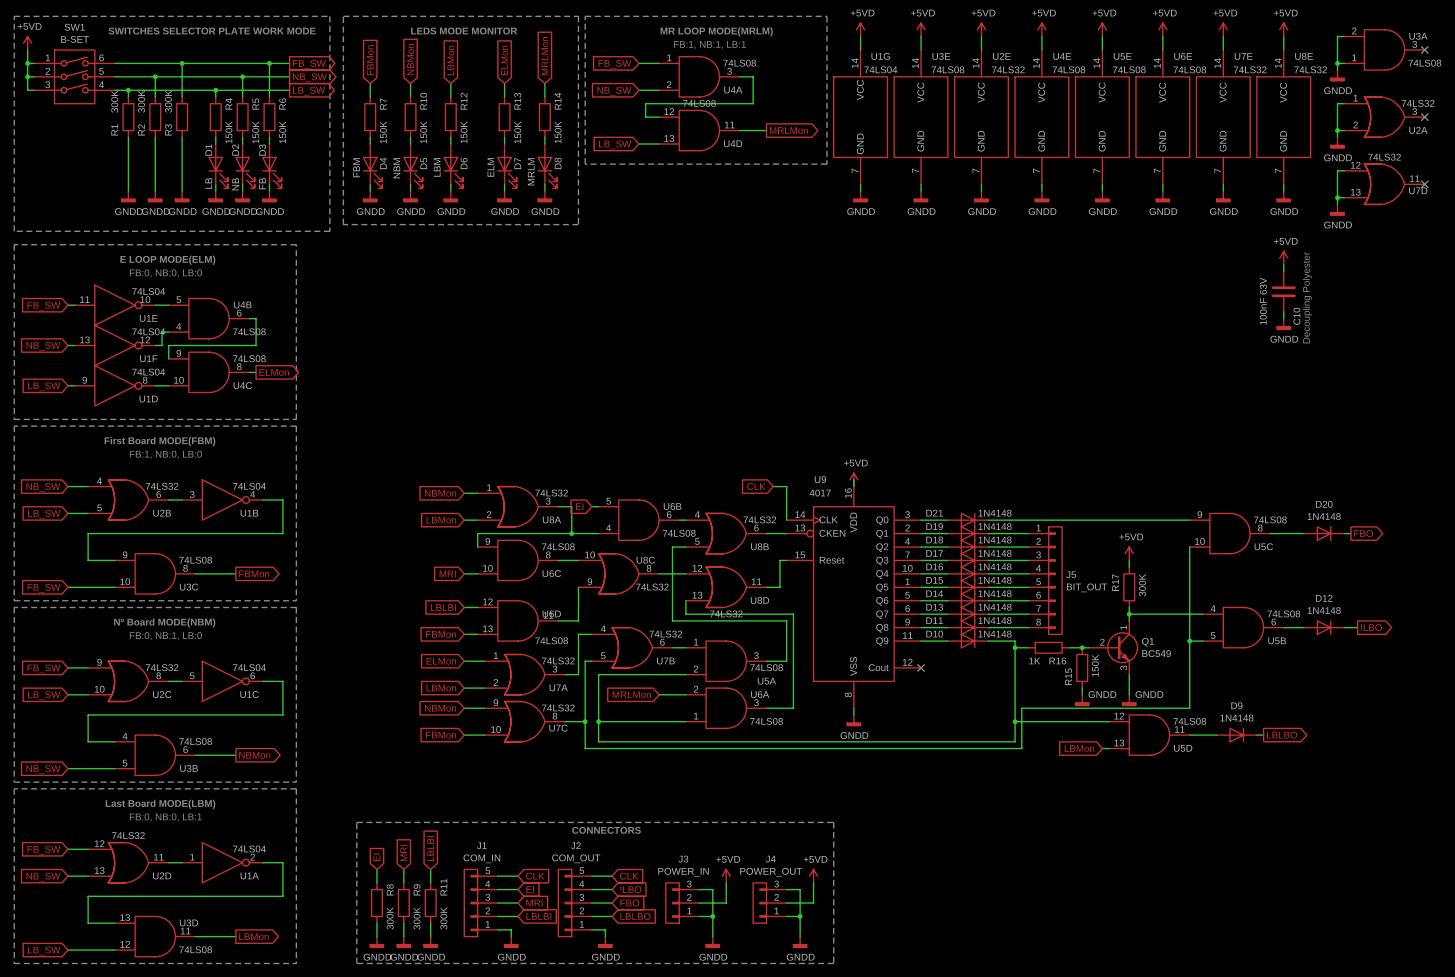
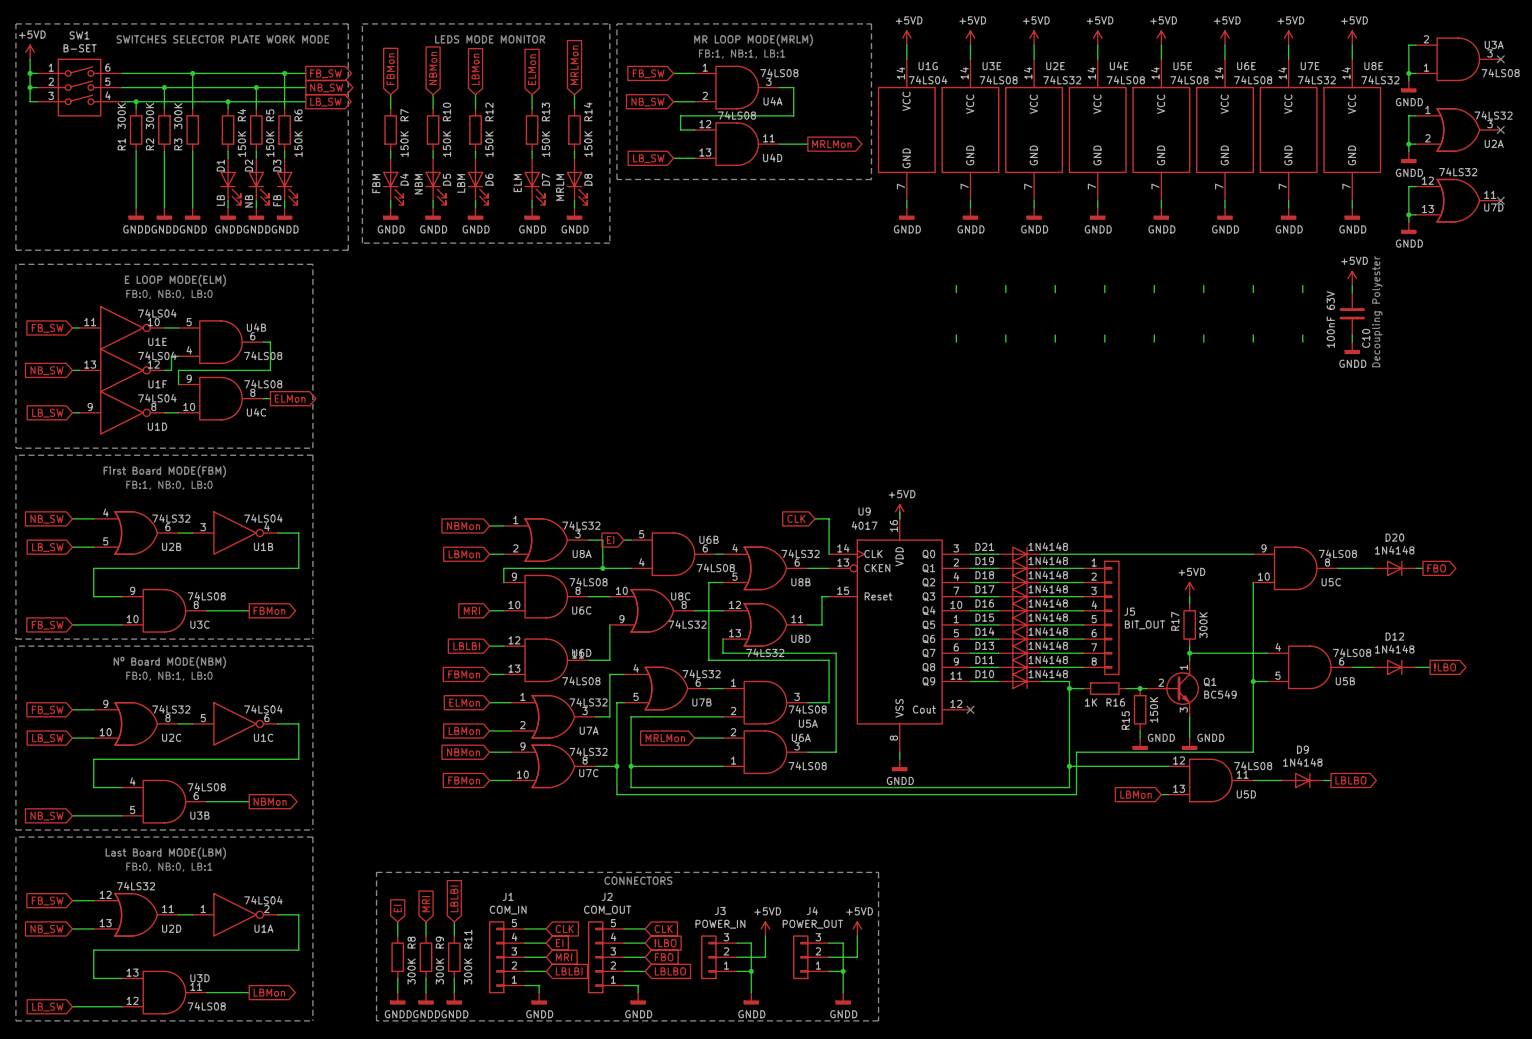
wire: none -> (956, 285) (956, 292)
wire: none -> (1005, 285) (1005, 292)
wire: none -> (1055, 285) (1055, 292)
wire: none -> (1104, 285) (1104, 292)
wire: none -> (1154, 285) (1154, 292)
wire: none -> (1203, 285) (1203, 292)
wire: none -> (1253, 285) (1253, 292)
wire: none -> (1302, 285) (1302, 292)
wire: none -> (956, 335) (956, 342)
wire: none -> (1005, 335) (1005, 342)
wire: none -> (1055, 335) (1055, 342)
wire: none -> (1104, 335) (1104, 342)
wire: none -> (1154, 335) (1154, 342)
wire: none -> (1203, 335) (1203, 342)
wire: none -> (1253, 335) (1253, 342)
wire: none -> (1302, 335) (1302, 342)

